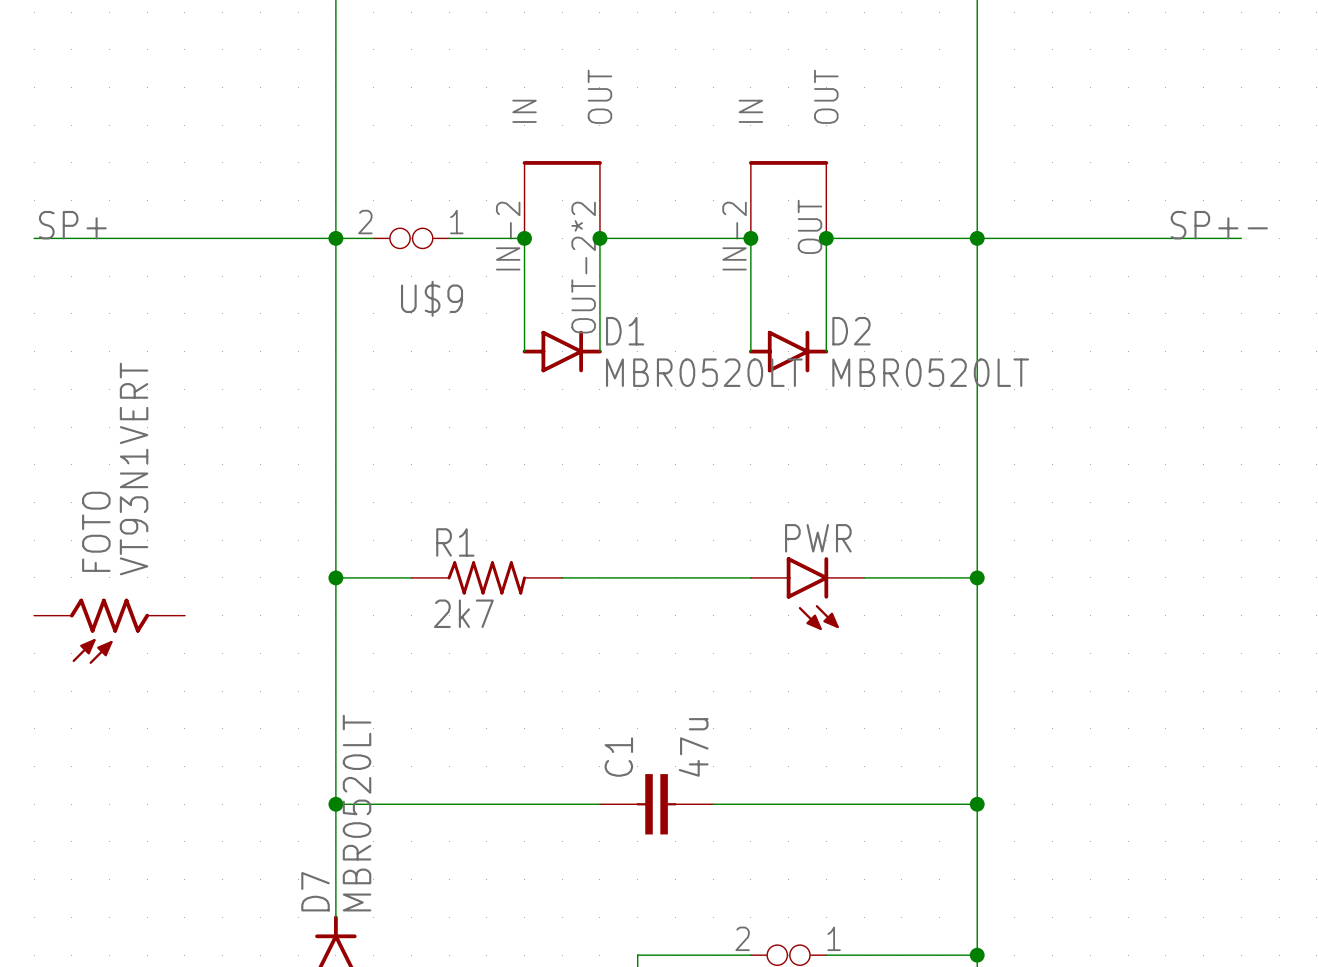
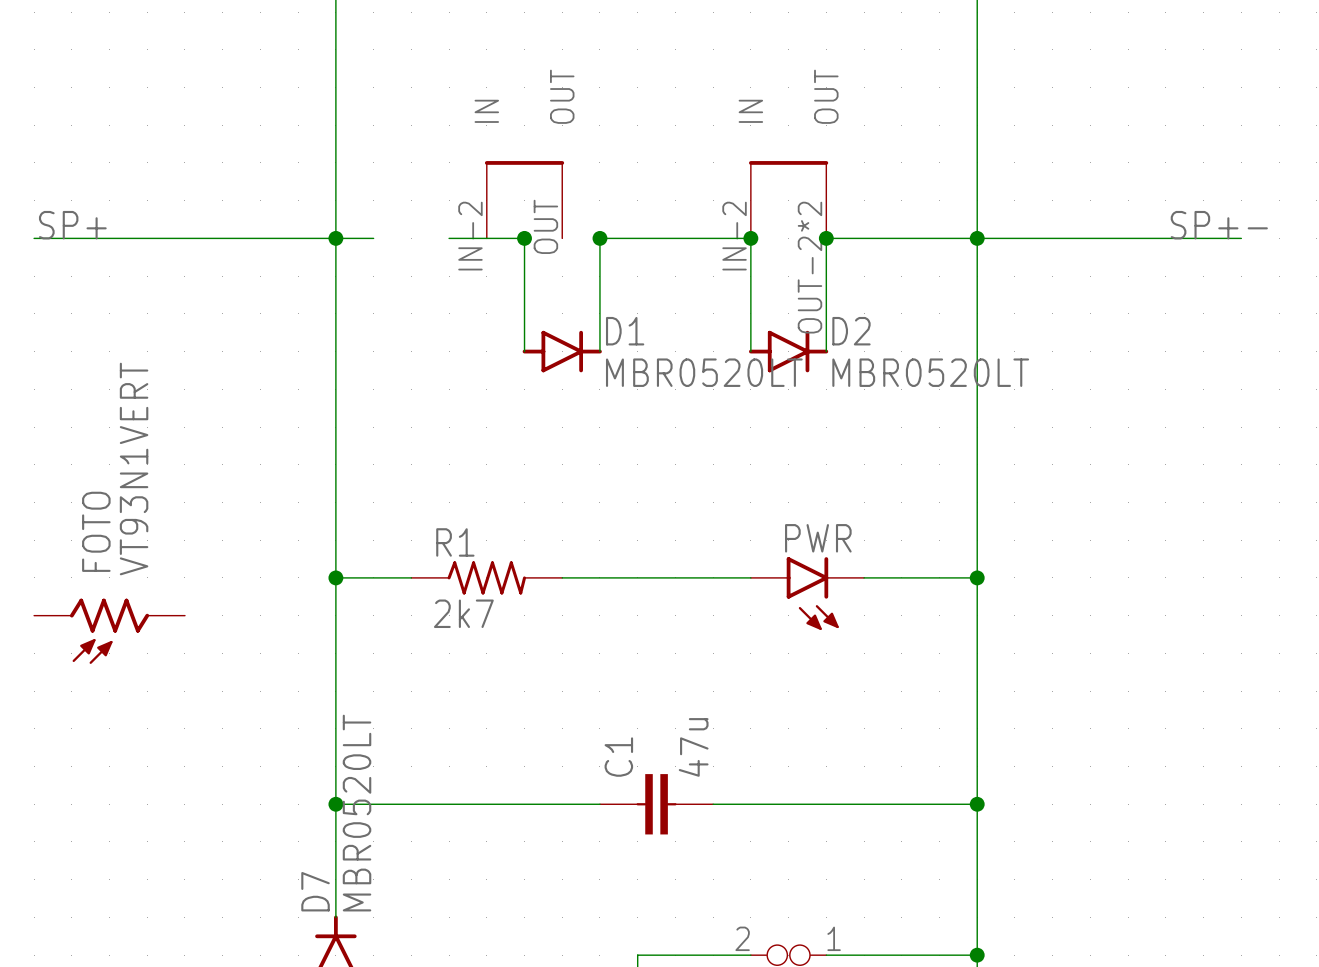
part: none -> (524, 199)
part: (562, 199) -> none
part pin number: OUT (809, 226) -> OUT-2*2 (809, 267)
U$9: (411, 238) -> none

